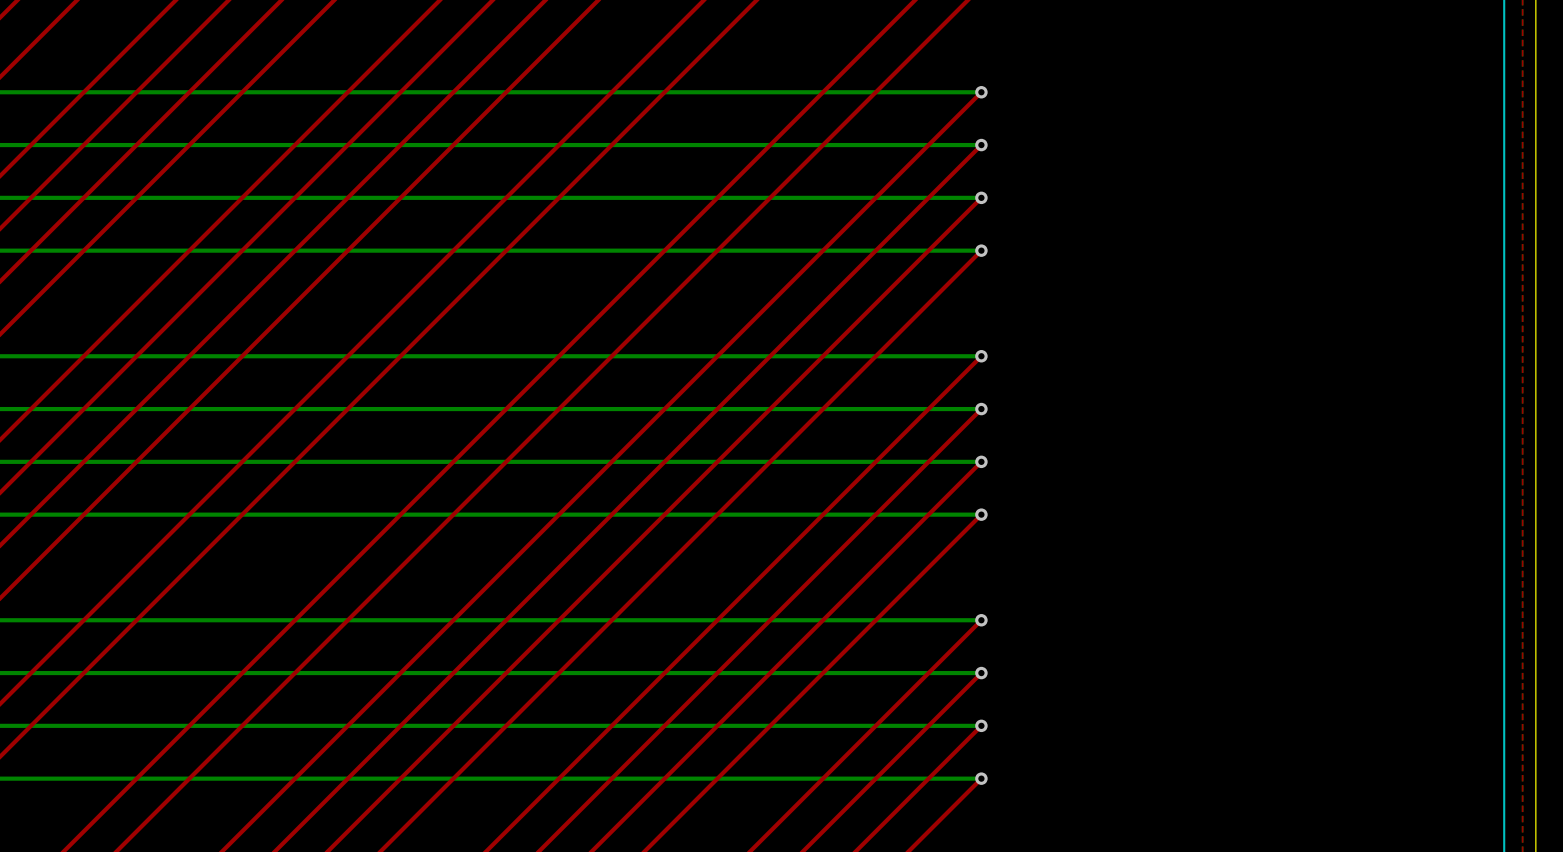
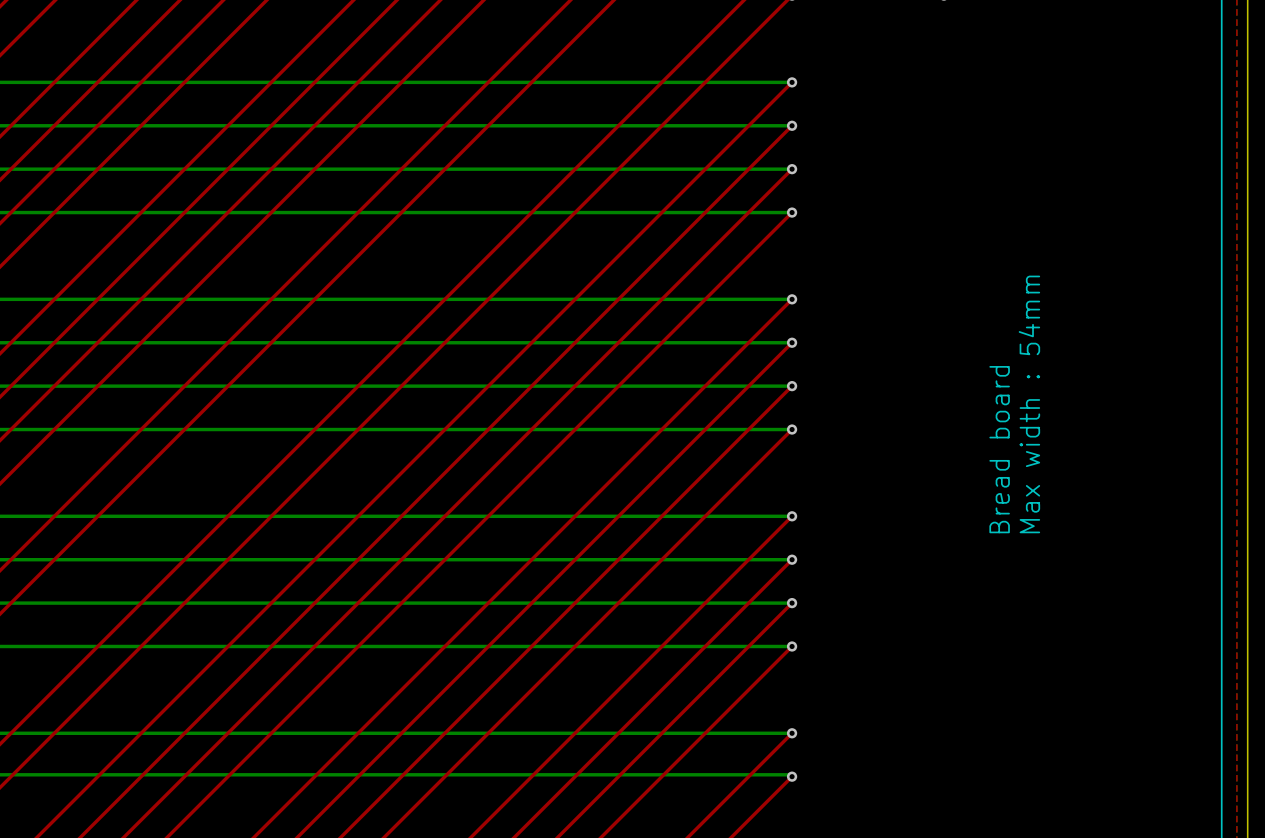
text: none -> Max width : 54mm (1029, 404)
text: none -> Bread board (999, 449)

